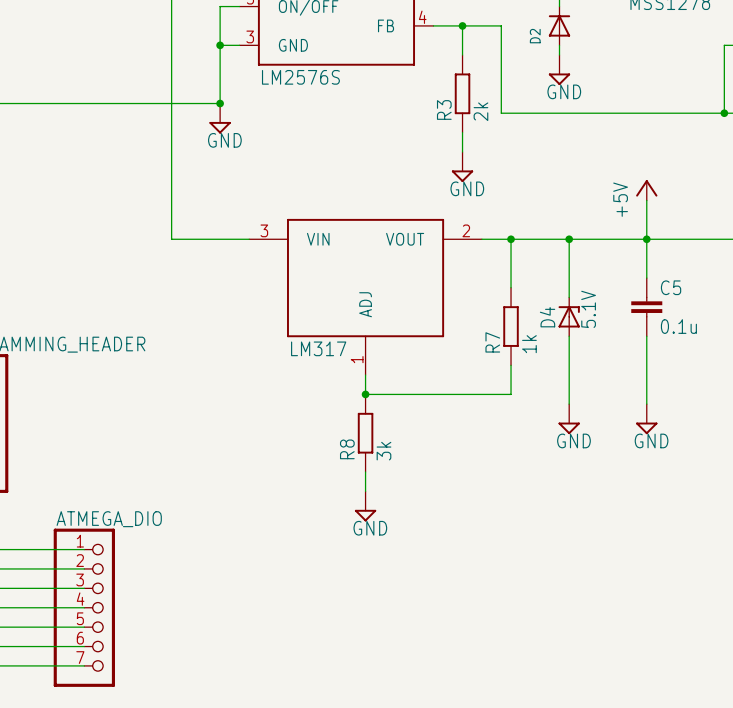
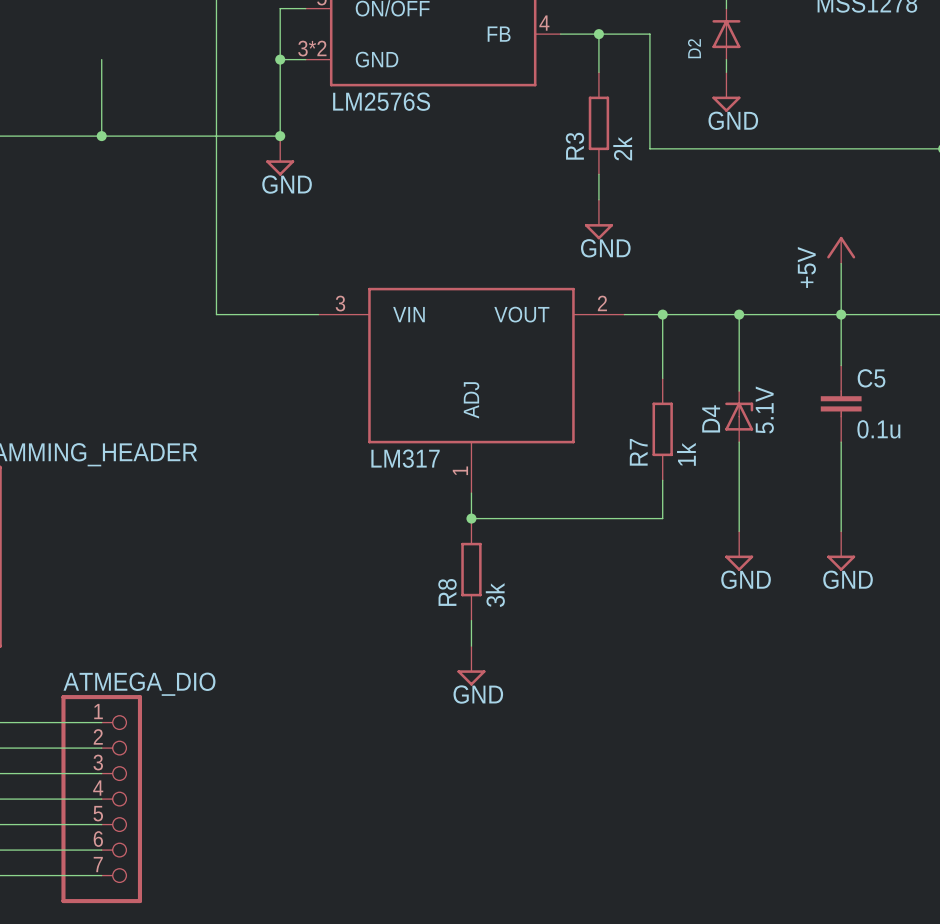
part pin number: 3 (250, 36) -> 3*2 (312, 48)
wire: none -> (101, 59) (101, 136)
junction: none -> (101, 136)

